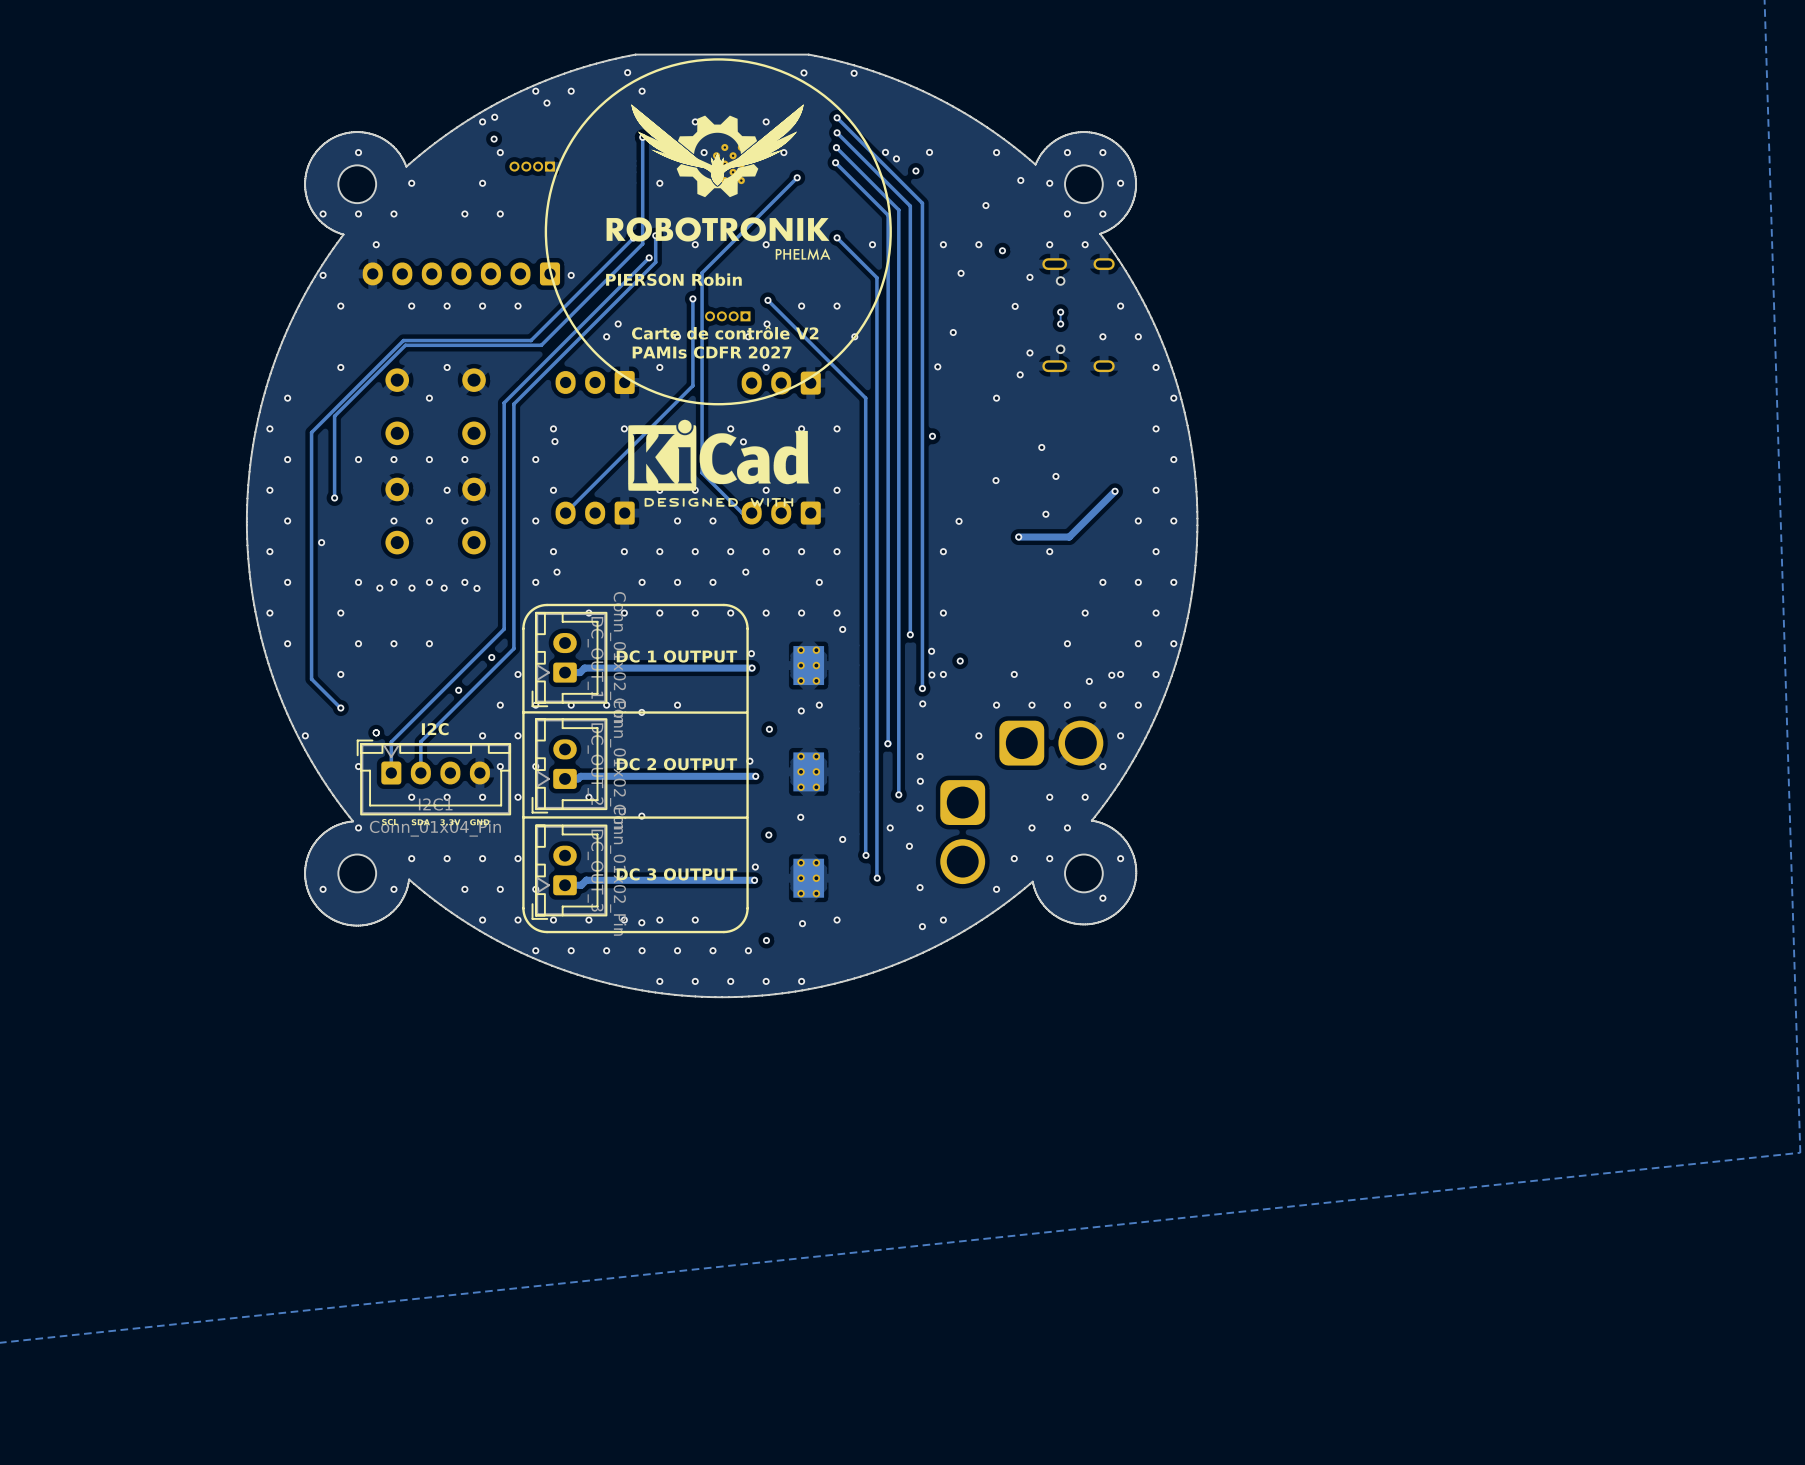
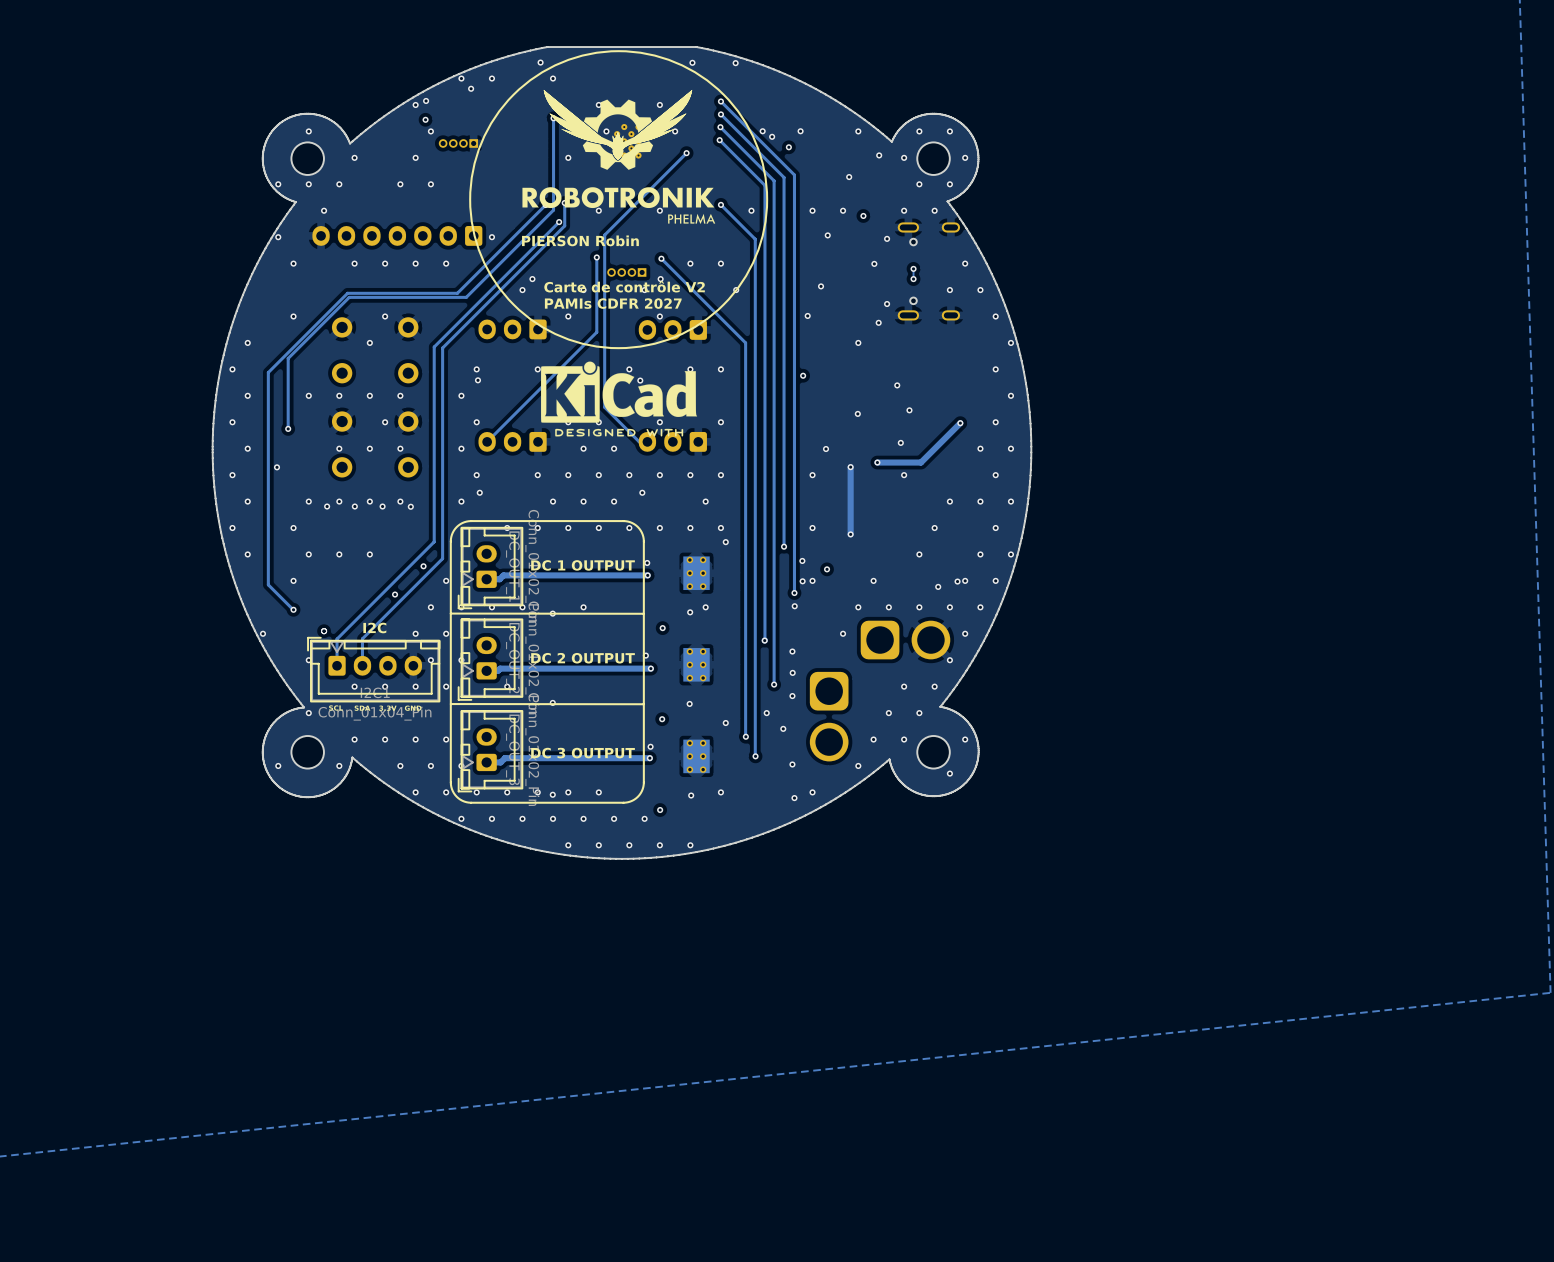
track: none -> (850, 467) (850, 534)
via: none -> (850, 467)
via: none -> (850, 534)

